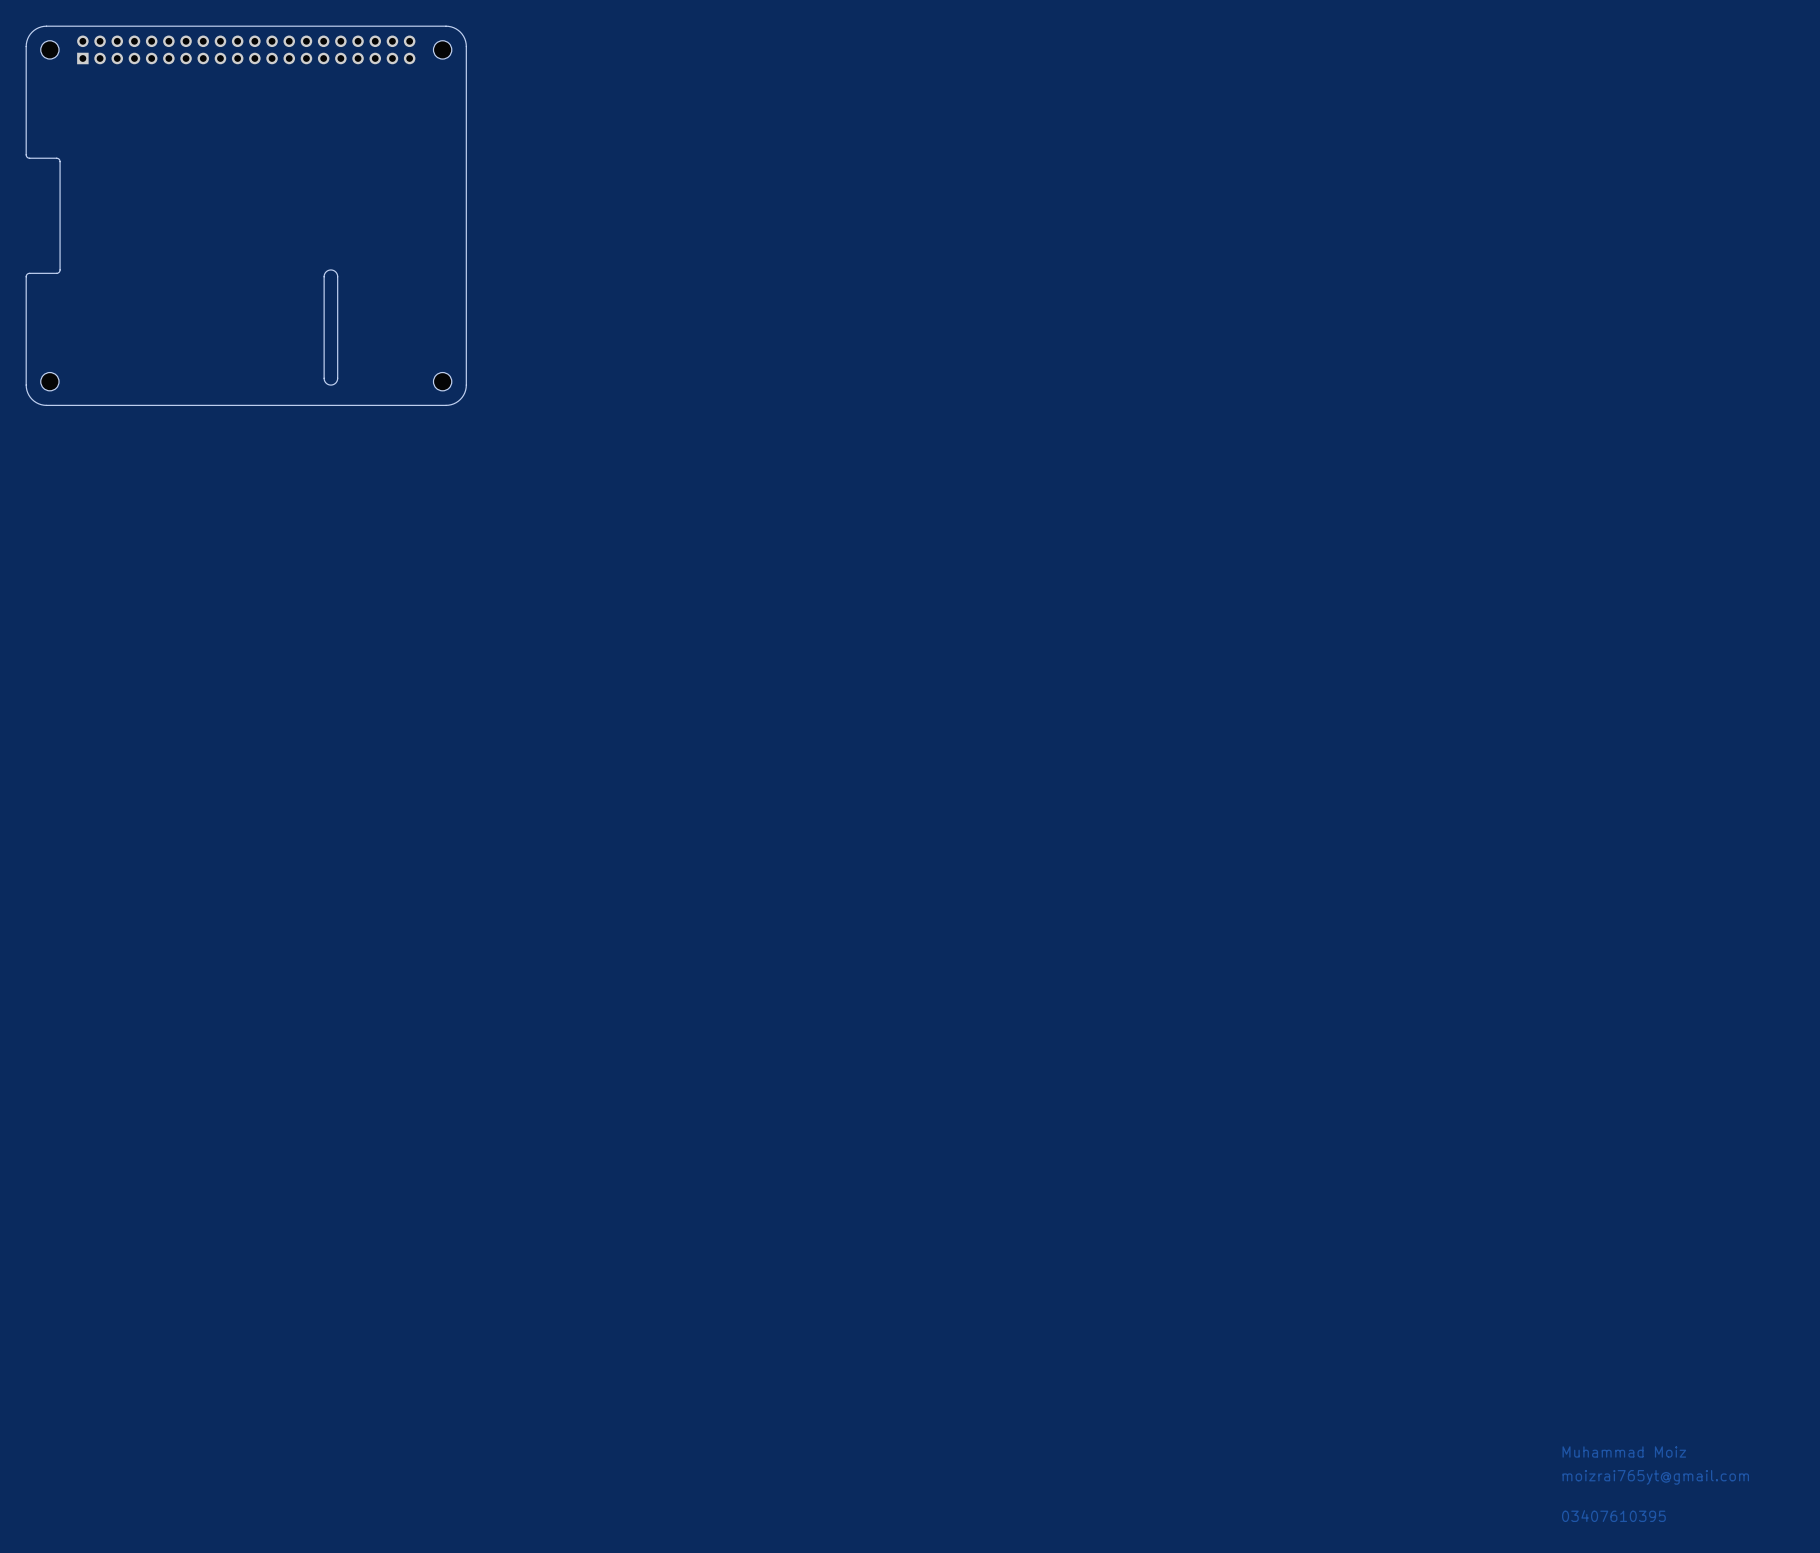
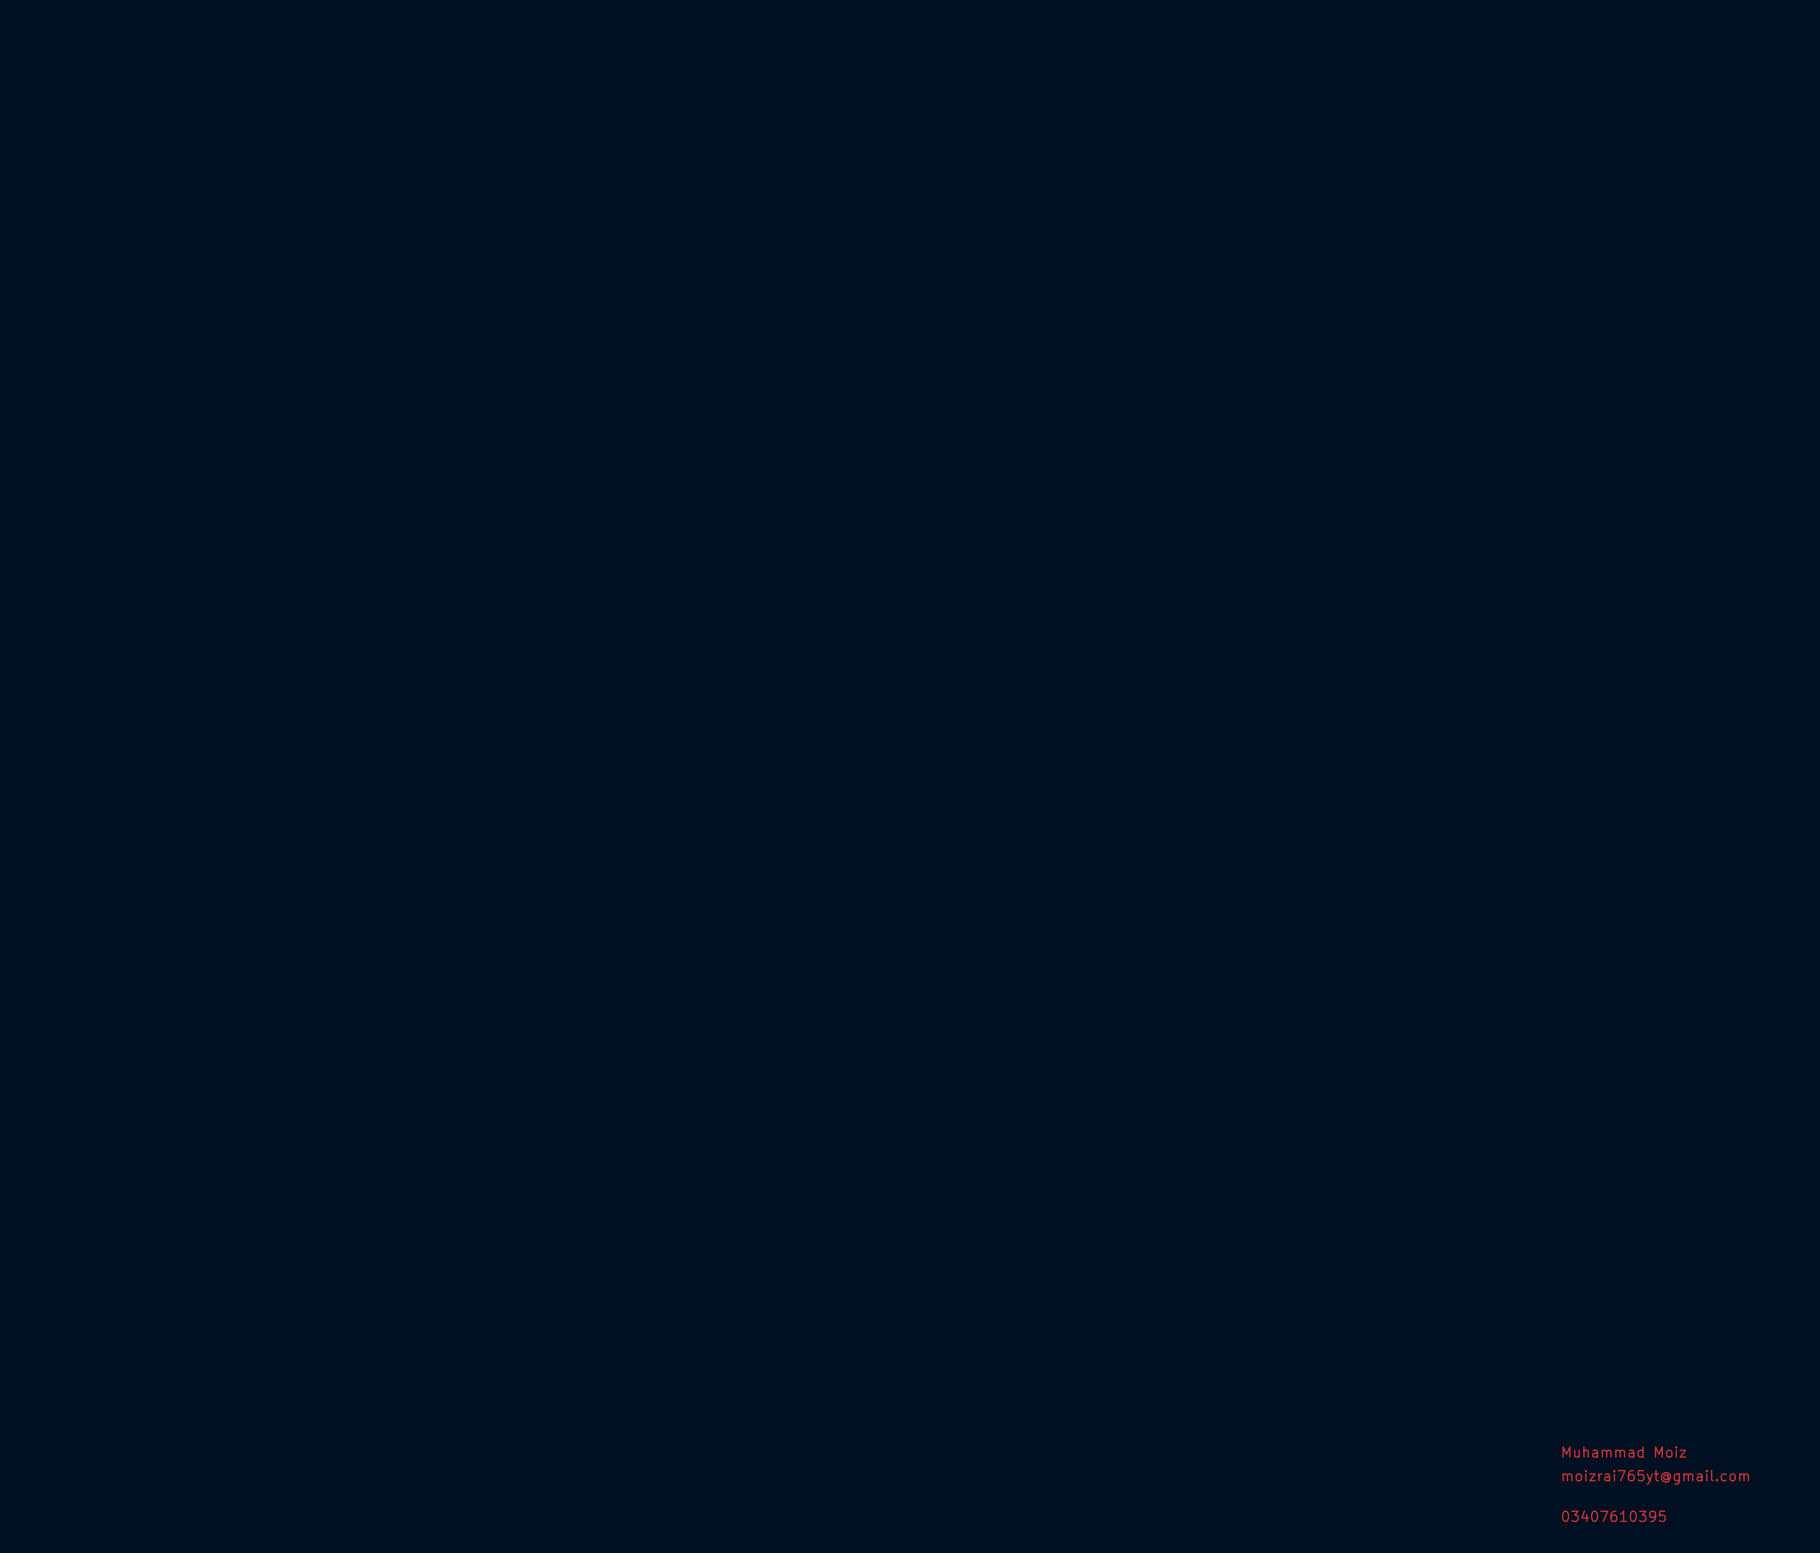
board edge: (46, 26) (446, 26) (453, 27) (460, 32) (464, 38) (466, 46) (466, 385) (464, 392) (460, 399) (453, 403) (446, 405) (46, 405) (38, 403) (32, 399) (27, 392) (26, 385) (26, 275) (29, 273) (57, 273) (60, 269) (59, 160) (57, 158) (29, 158) (26, 154) (26, 43) (32, 32) (38, 27) (46, 26) -> none
part: (49, 49) -> none
part: (246, 49) -> none
part: (442, 49) -> none
board edge: (324, 276) (324, 379) (326, 383) (331, 385) (336, 382) (337, 378) (337, 275) (335, 271) (330, 269) (326, 271) (324, 276) -> none
part: (49, 381) -> none
part: (442, 381) -> none

